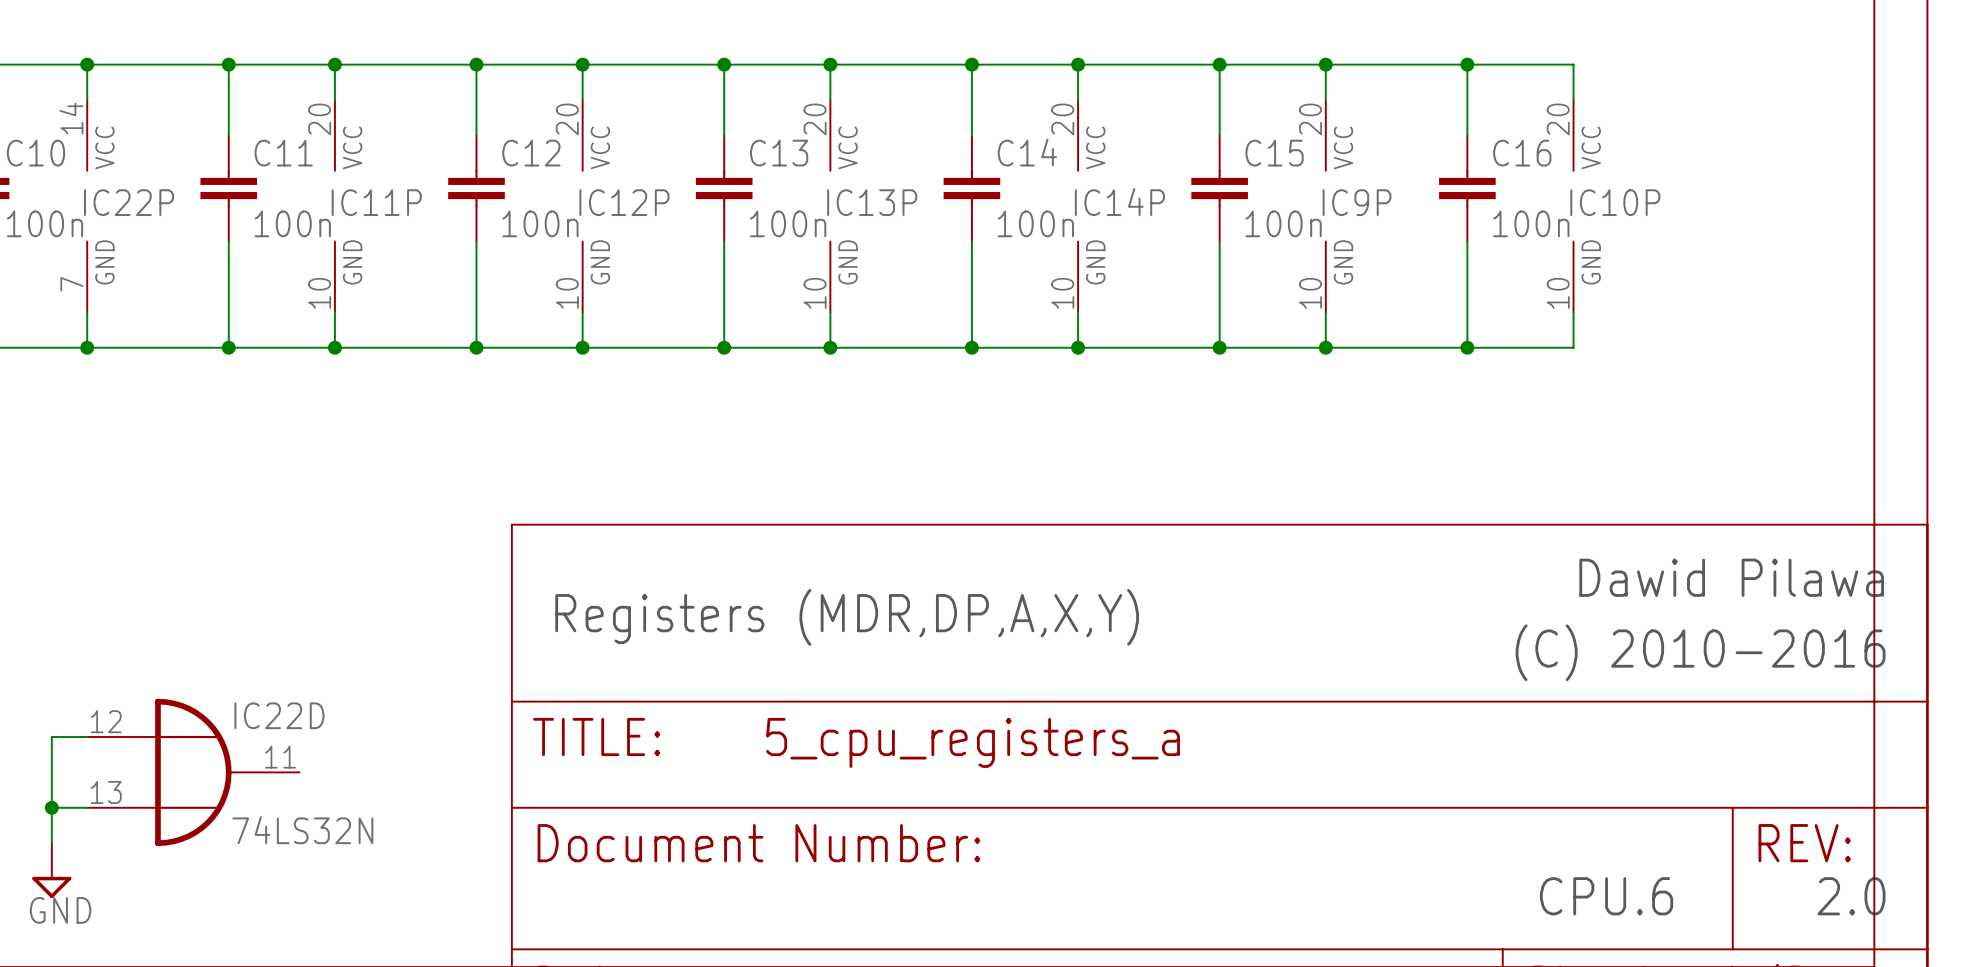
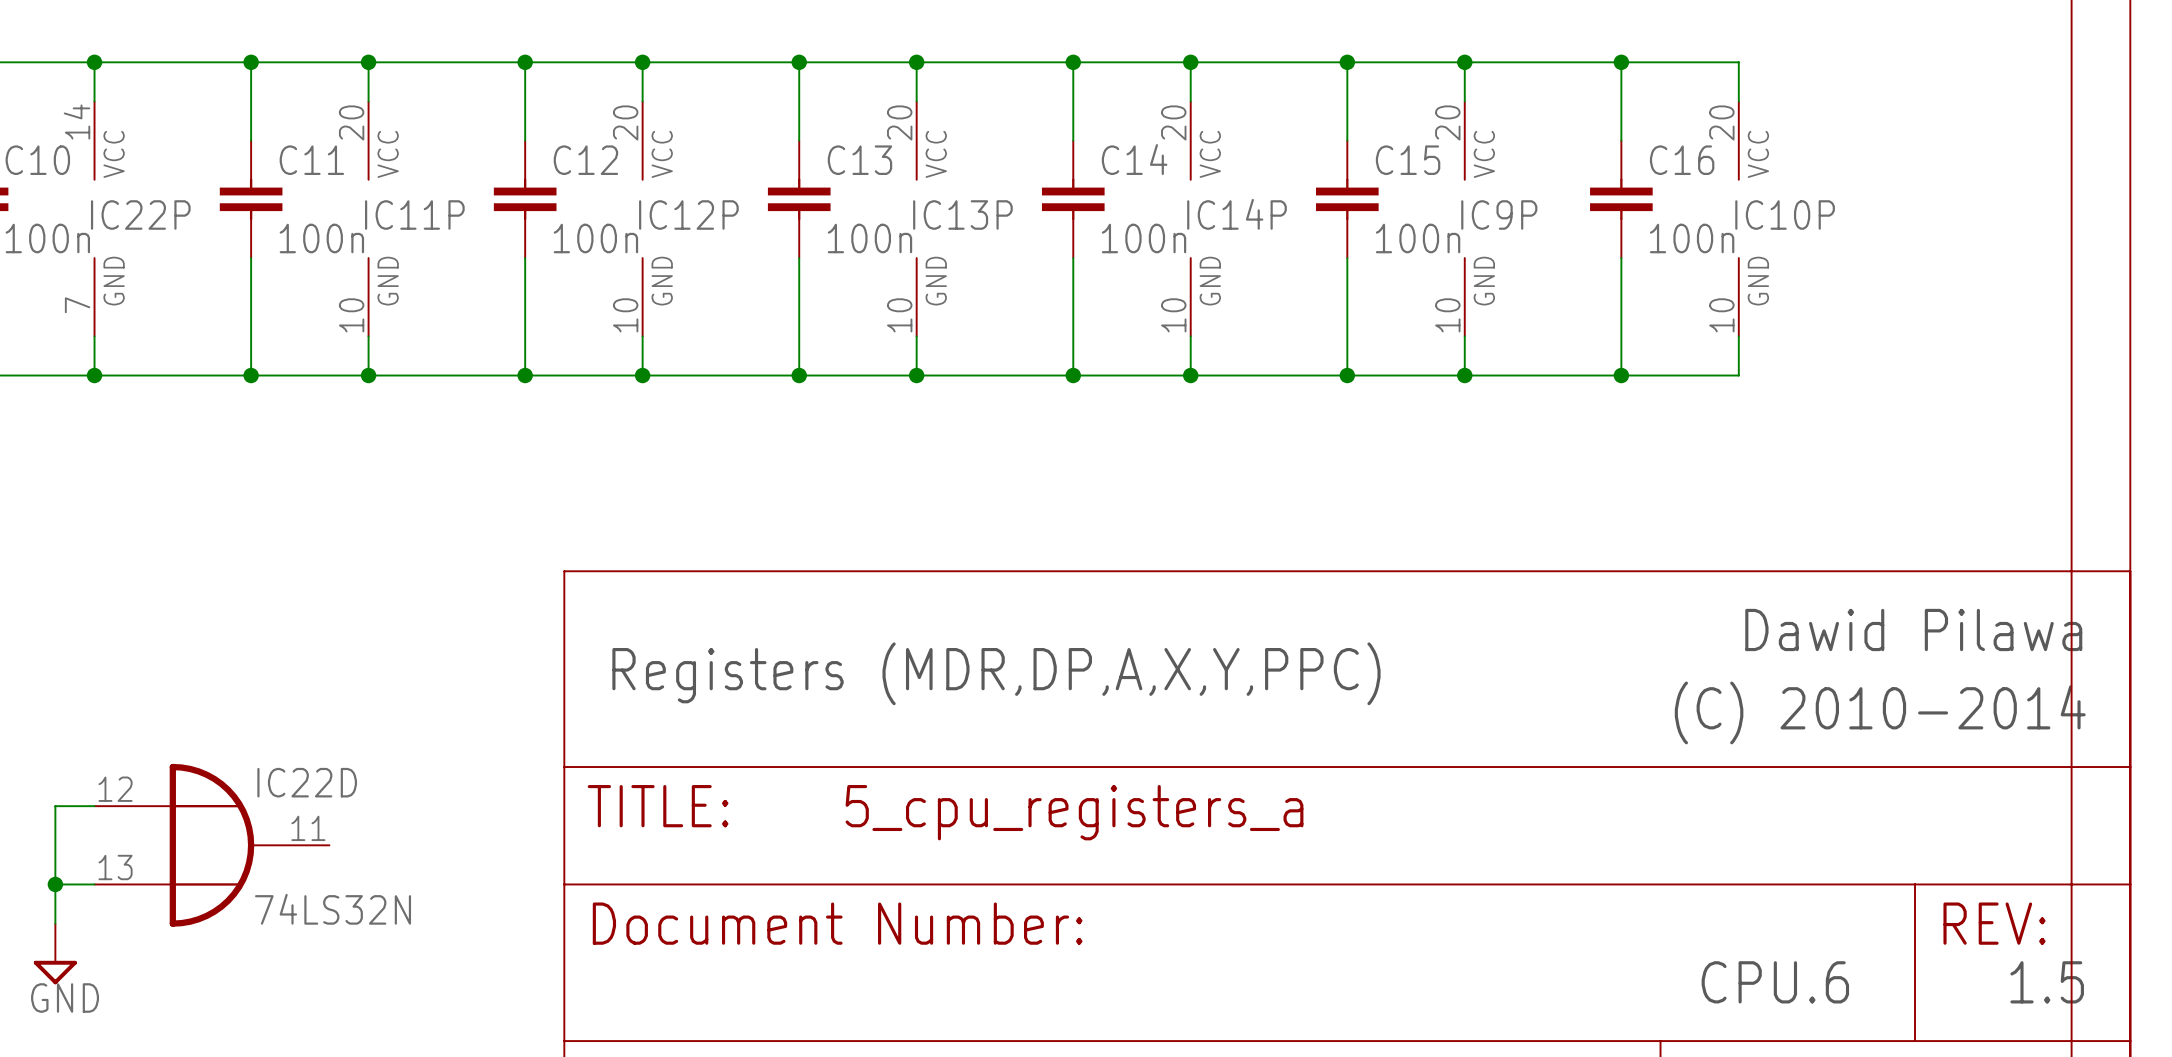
text: Registers (MDR,DP,A,X,Y) (847, 617) -> Registers (MDR,DP,A,X,Y,PPC) (996, 673)
text: (C) 2010-2016 (1700, 652) -> (C) 2010-2014 (1880, 712)
text: 2.0 (1851, 896) -> 1.5 (2047, 982)

